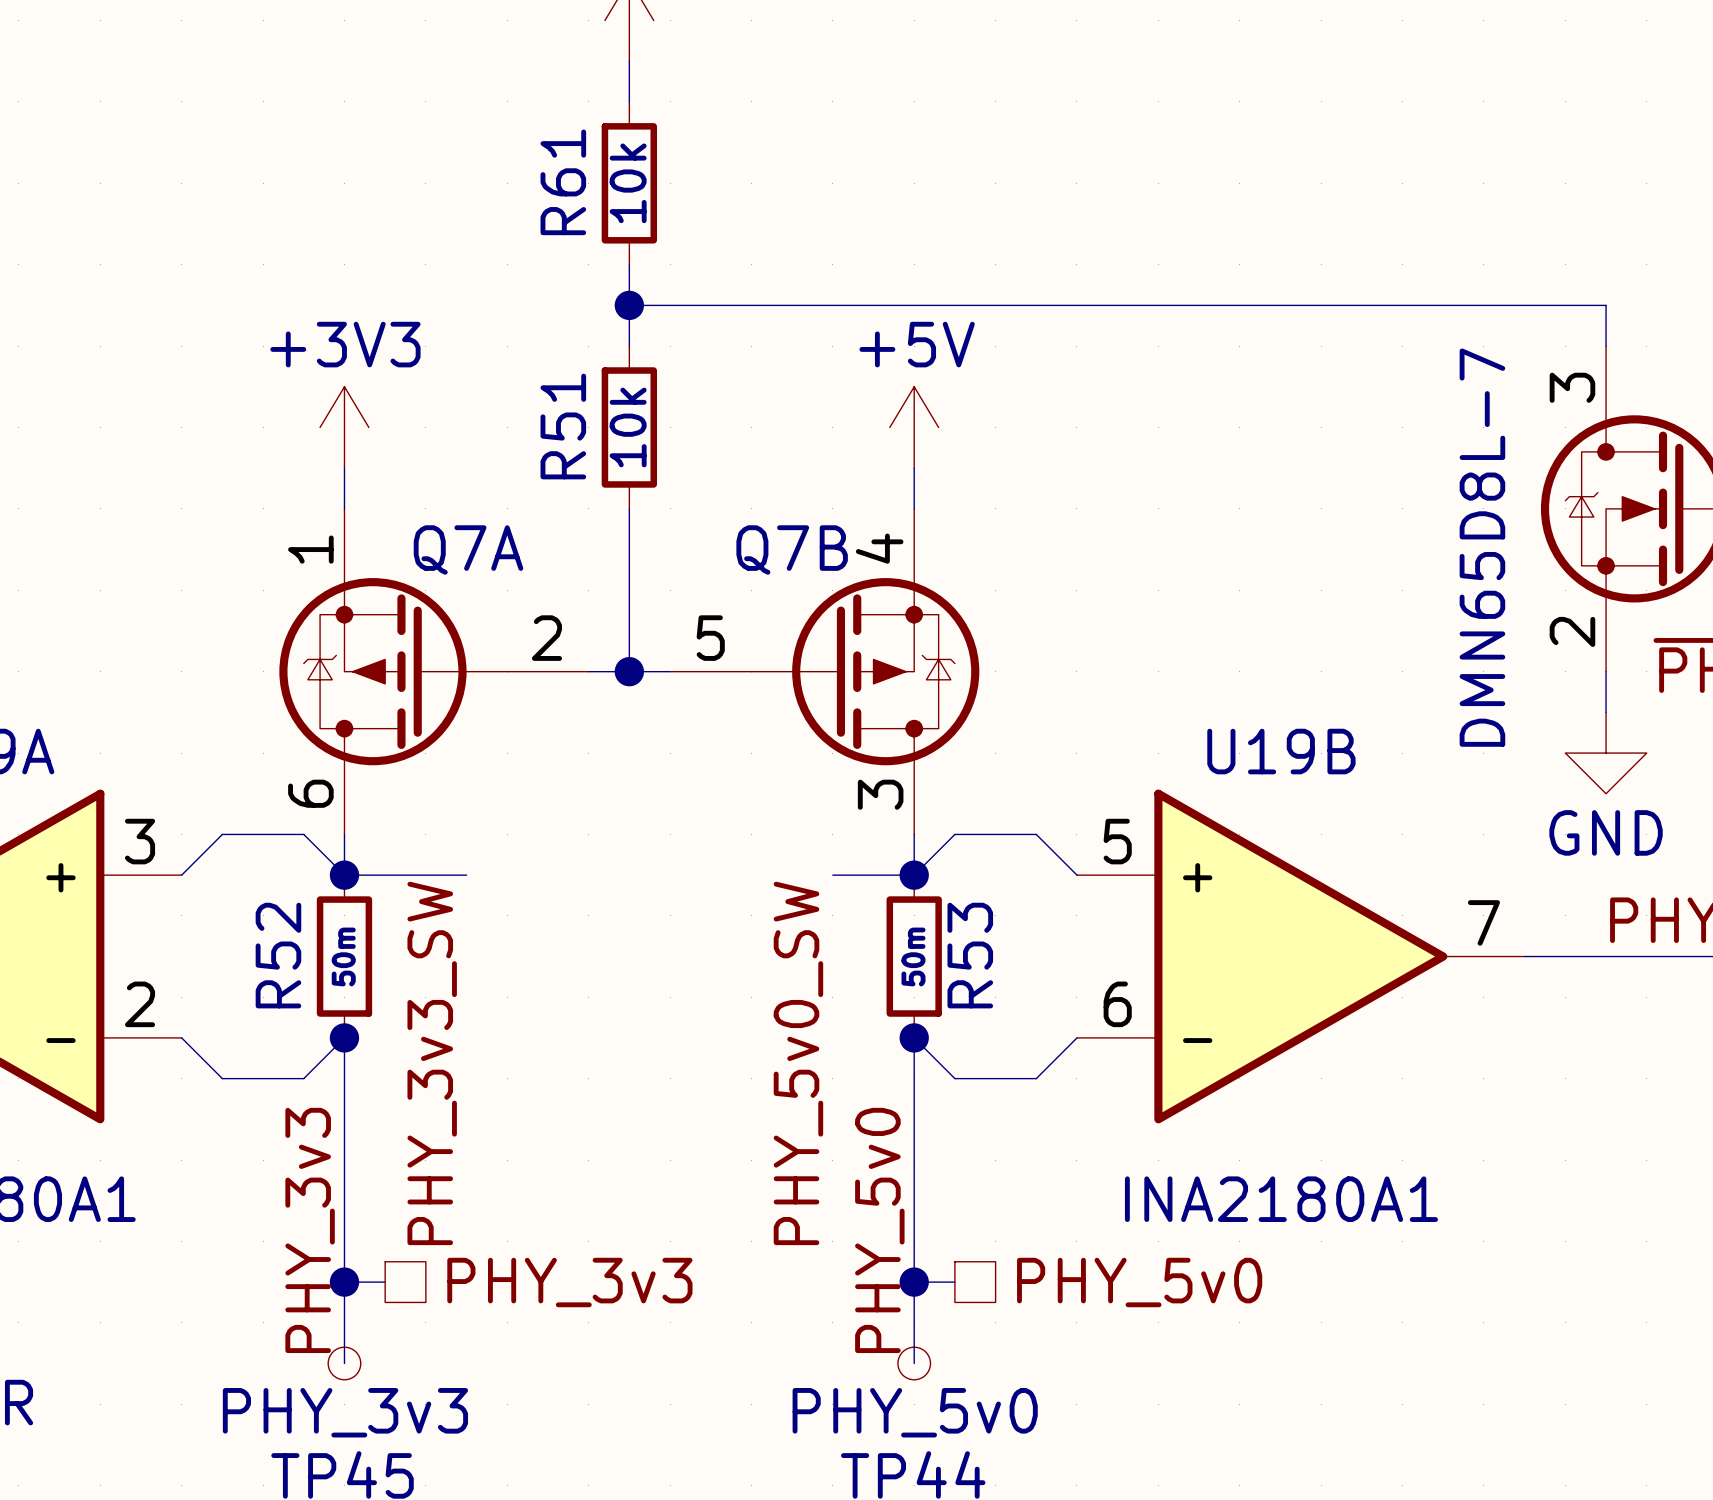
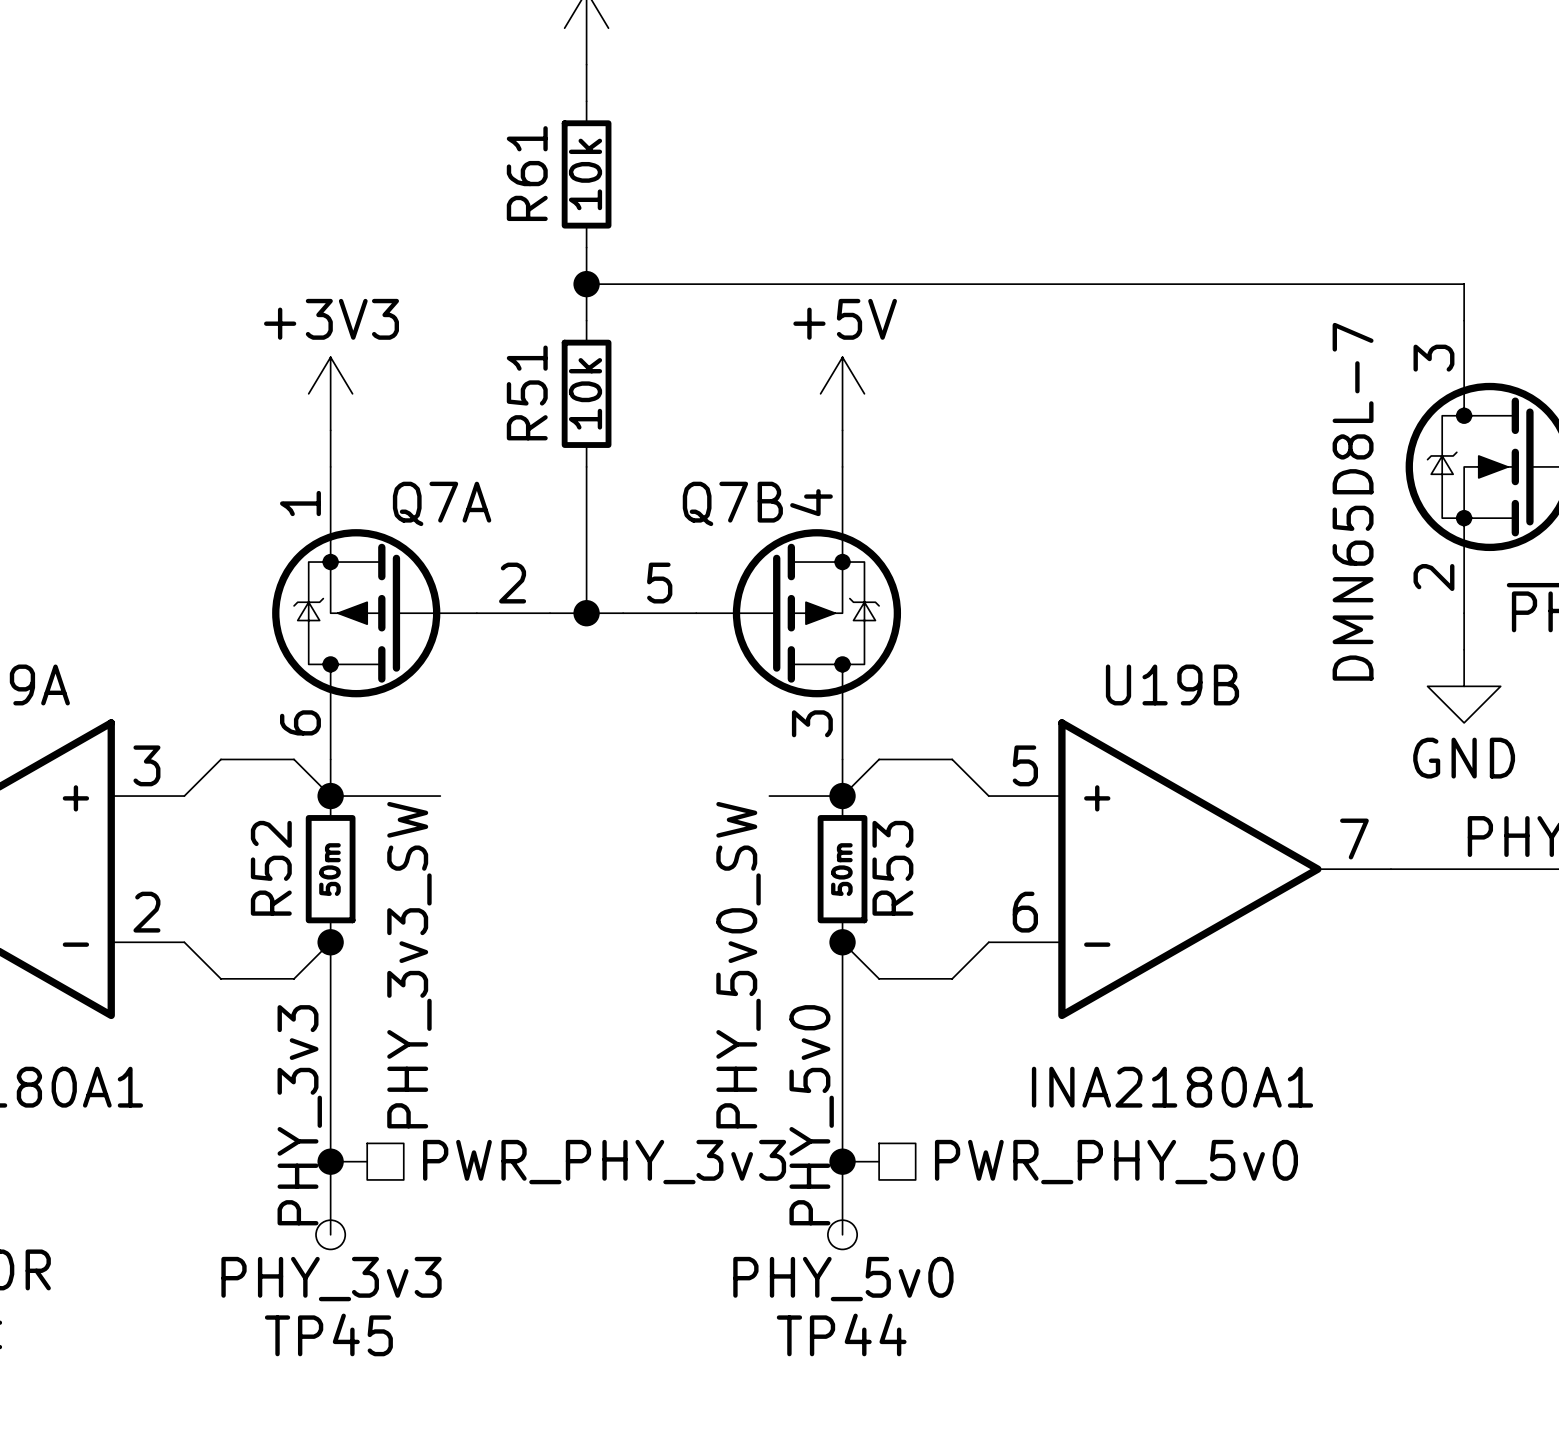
hierarchical label: PHY_3v3 (569, 1282) -> PWR_PHY_3v3 (604, 1162)
hierarchical label: PHY_5v0 (1139, 1282) -> PWR_PHY_5v0 (1116, 1162)

